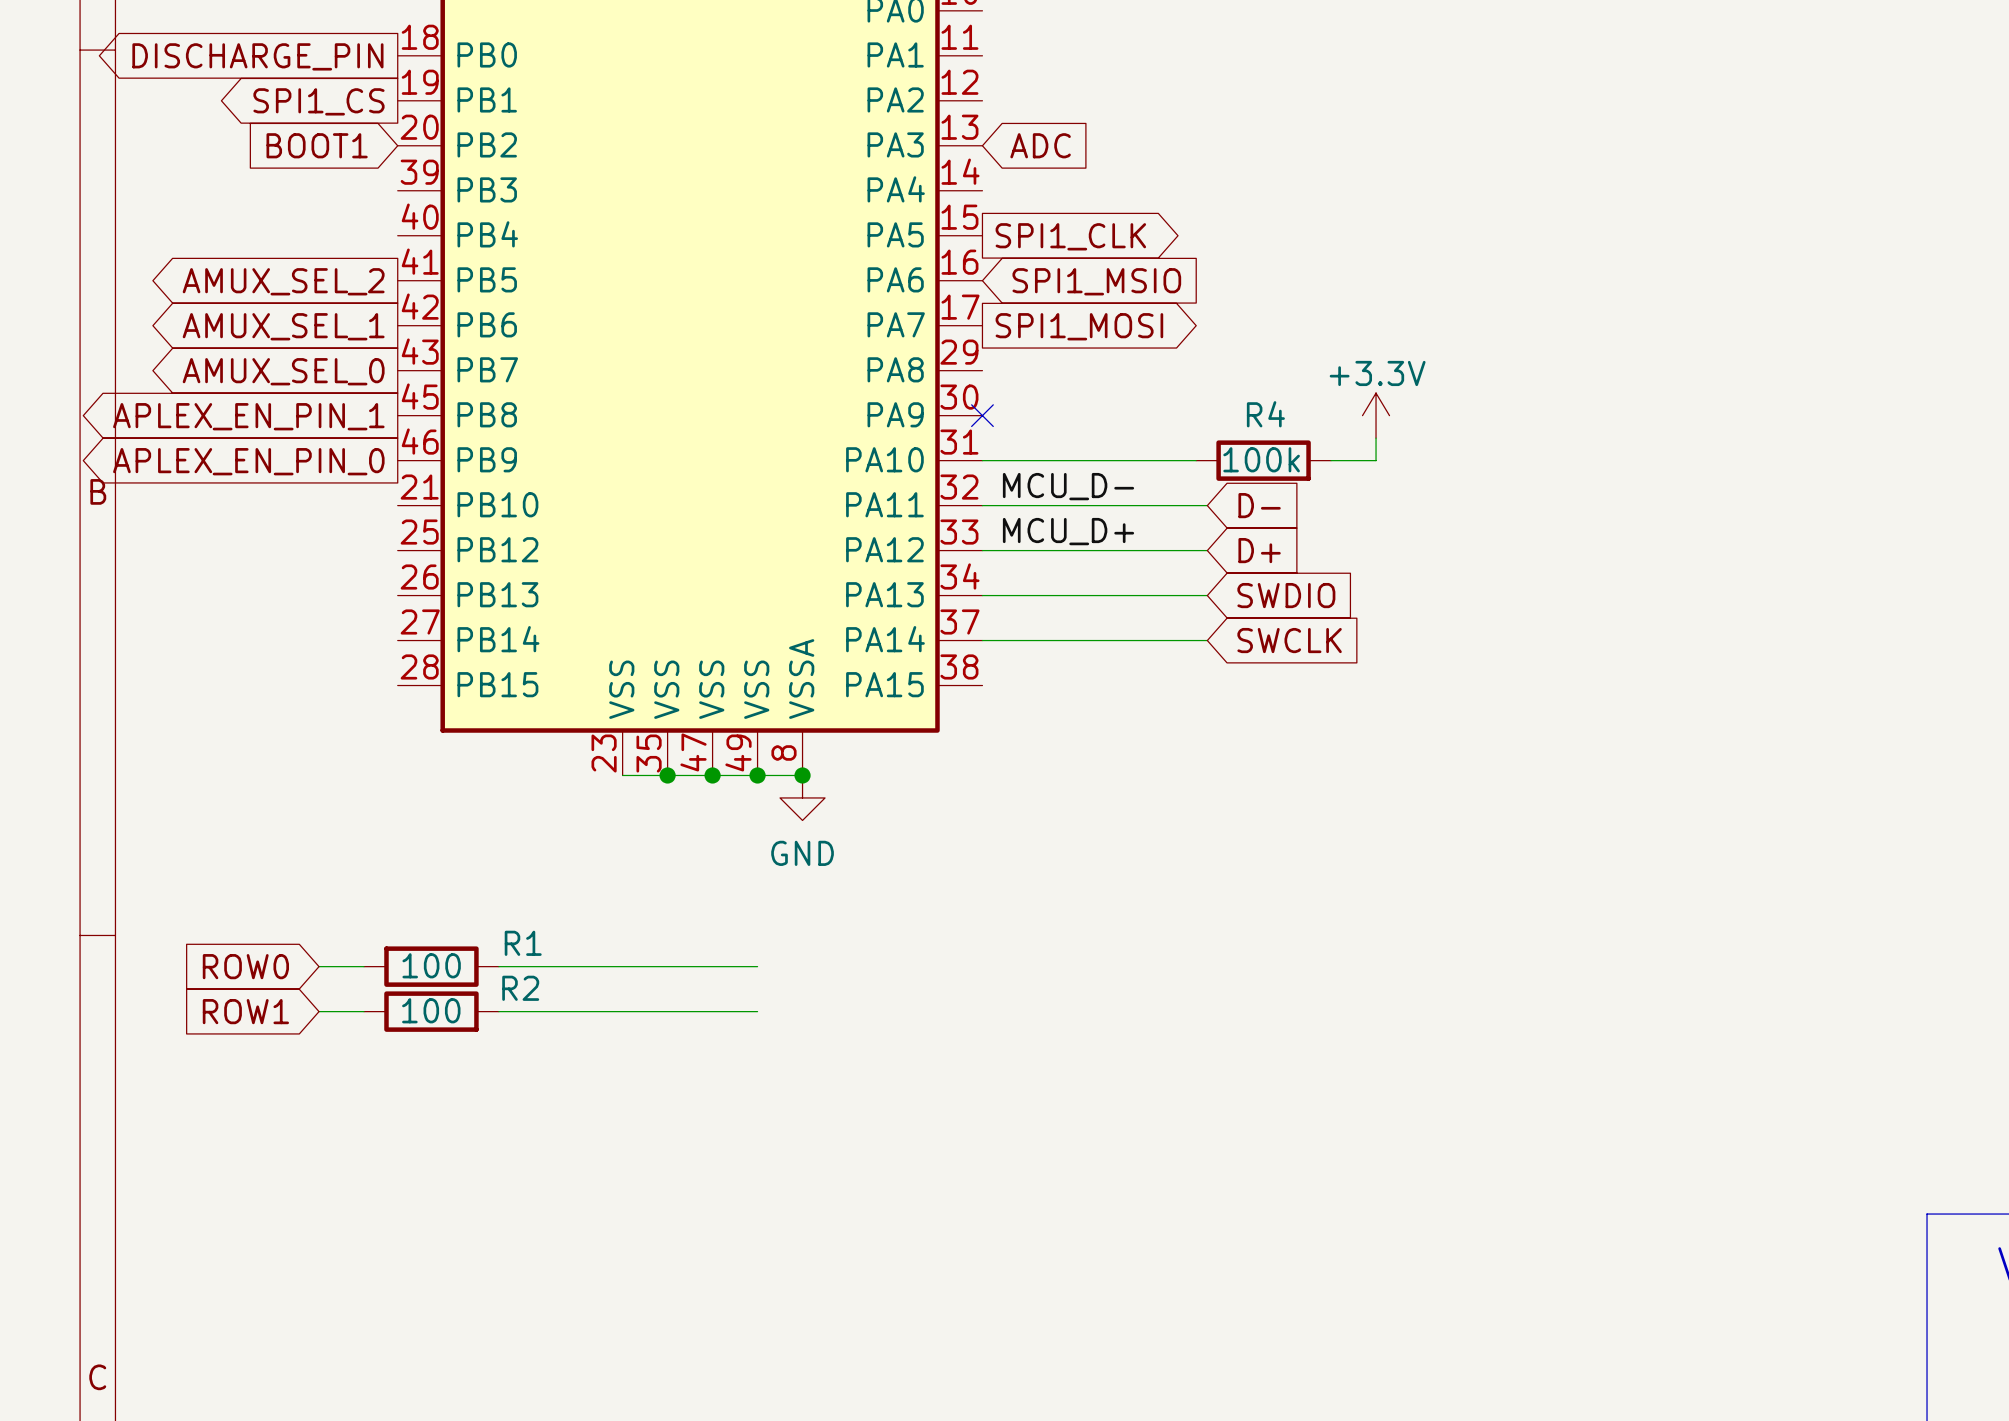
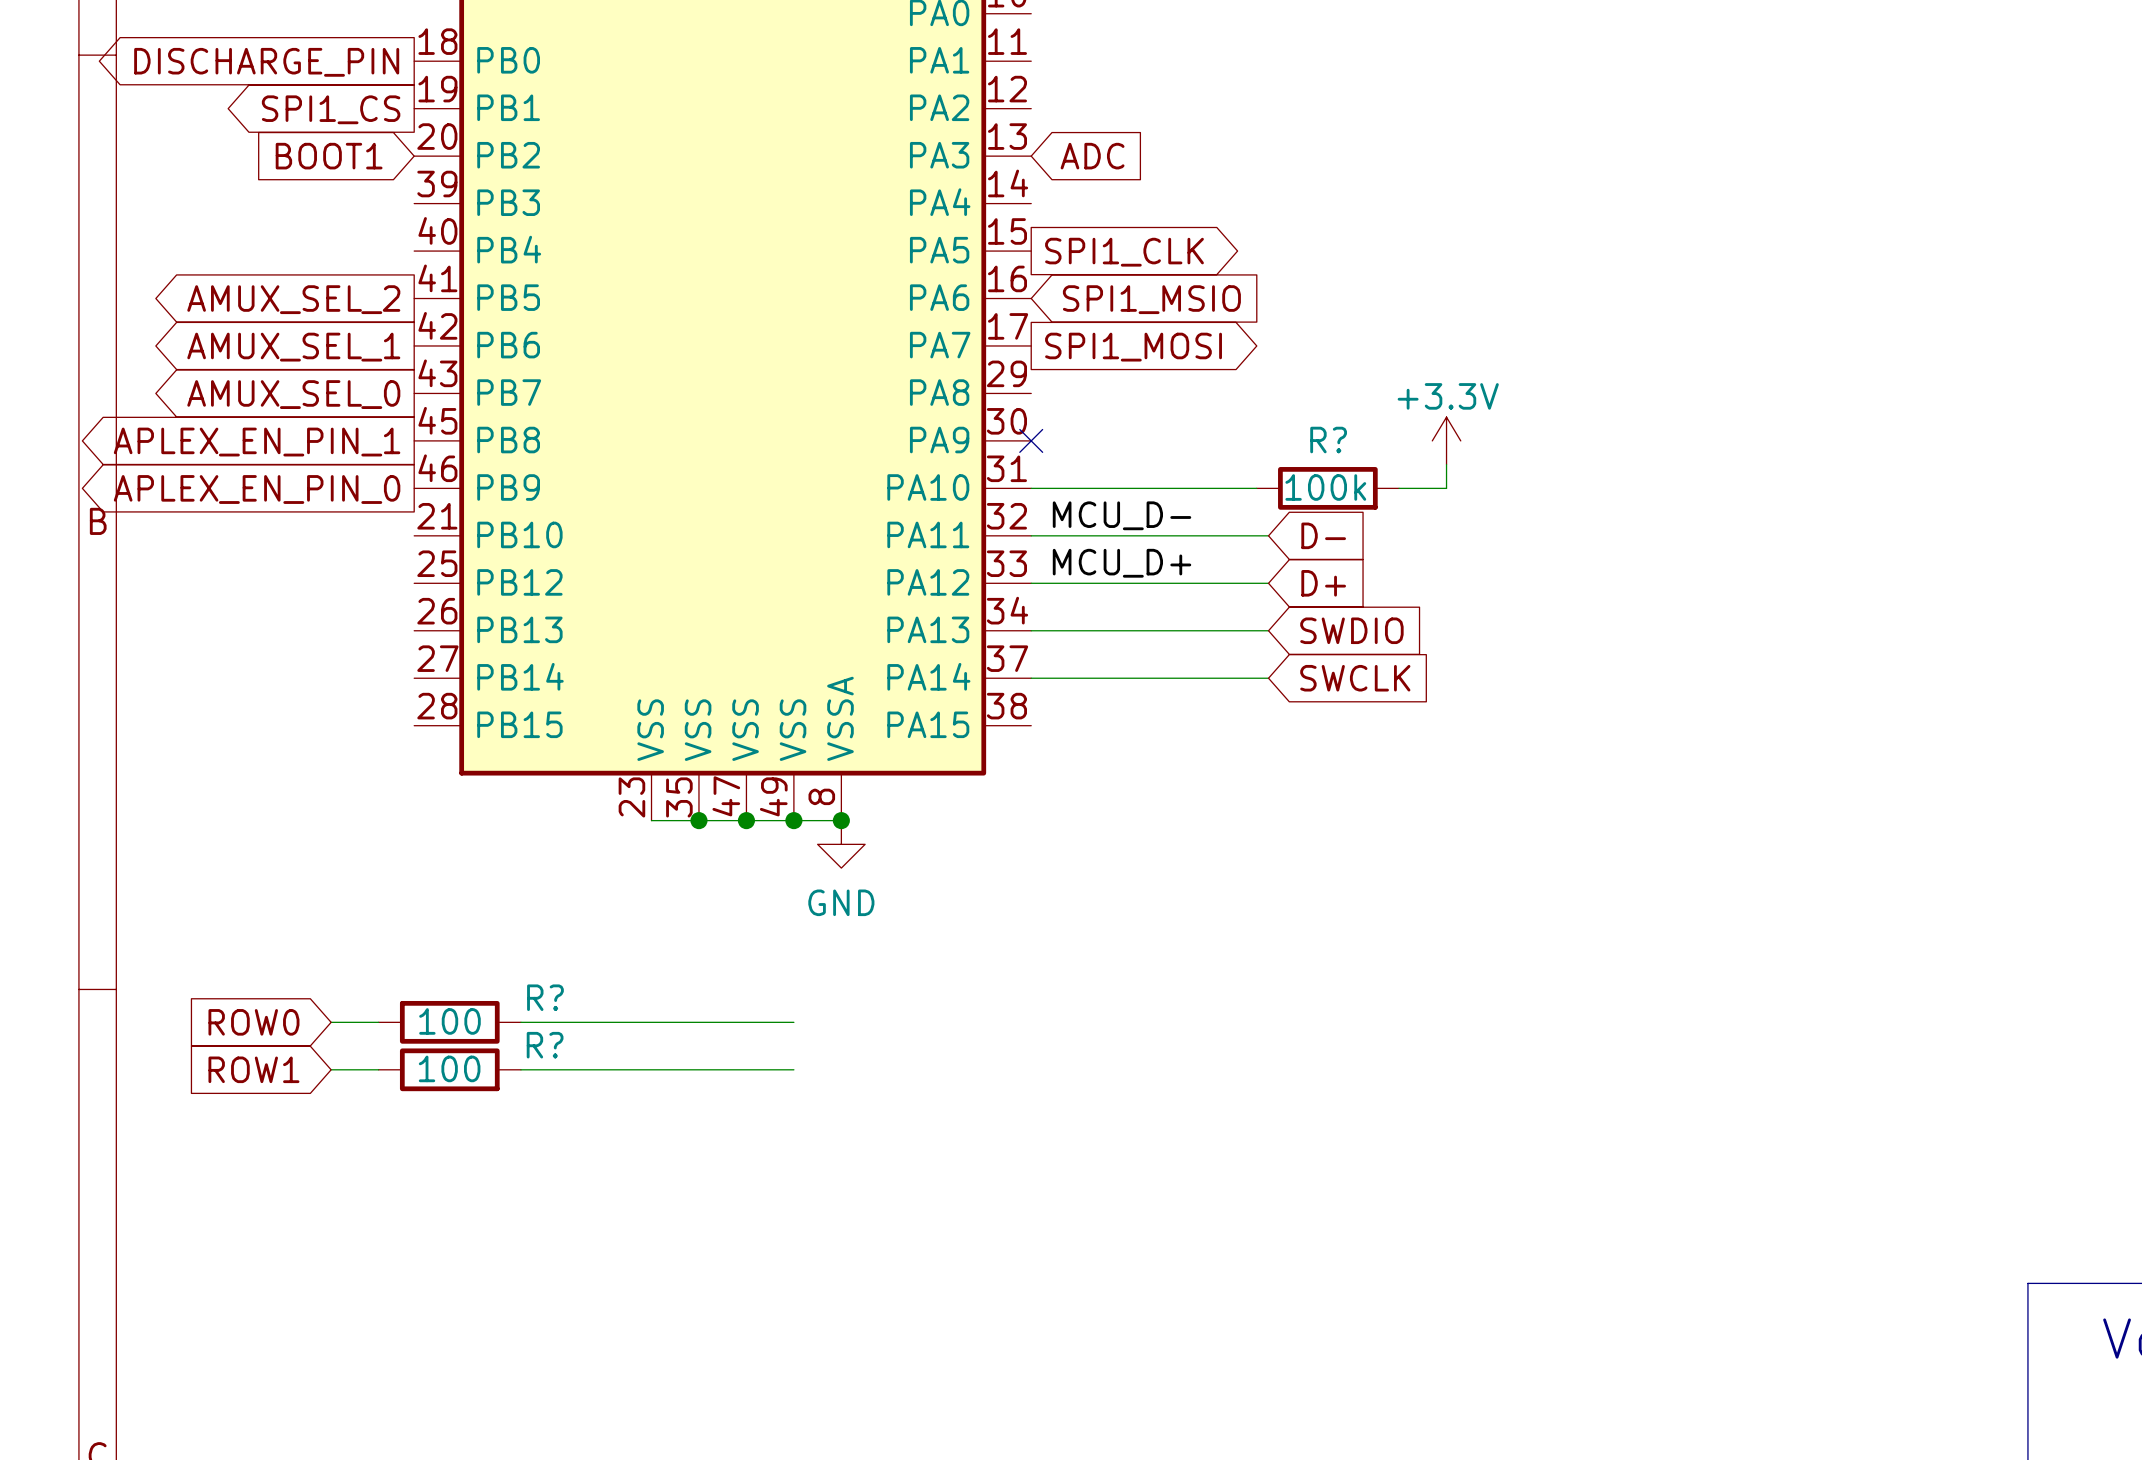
R4 name: R4 (1265, 414) -> R? (1328, 440)
R1 name: R1 (523, 943) -> R? (545, 997)
R2 name: R2 (520, 988) -> R? (545, 1045)

